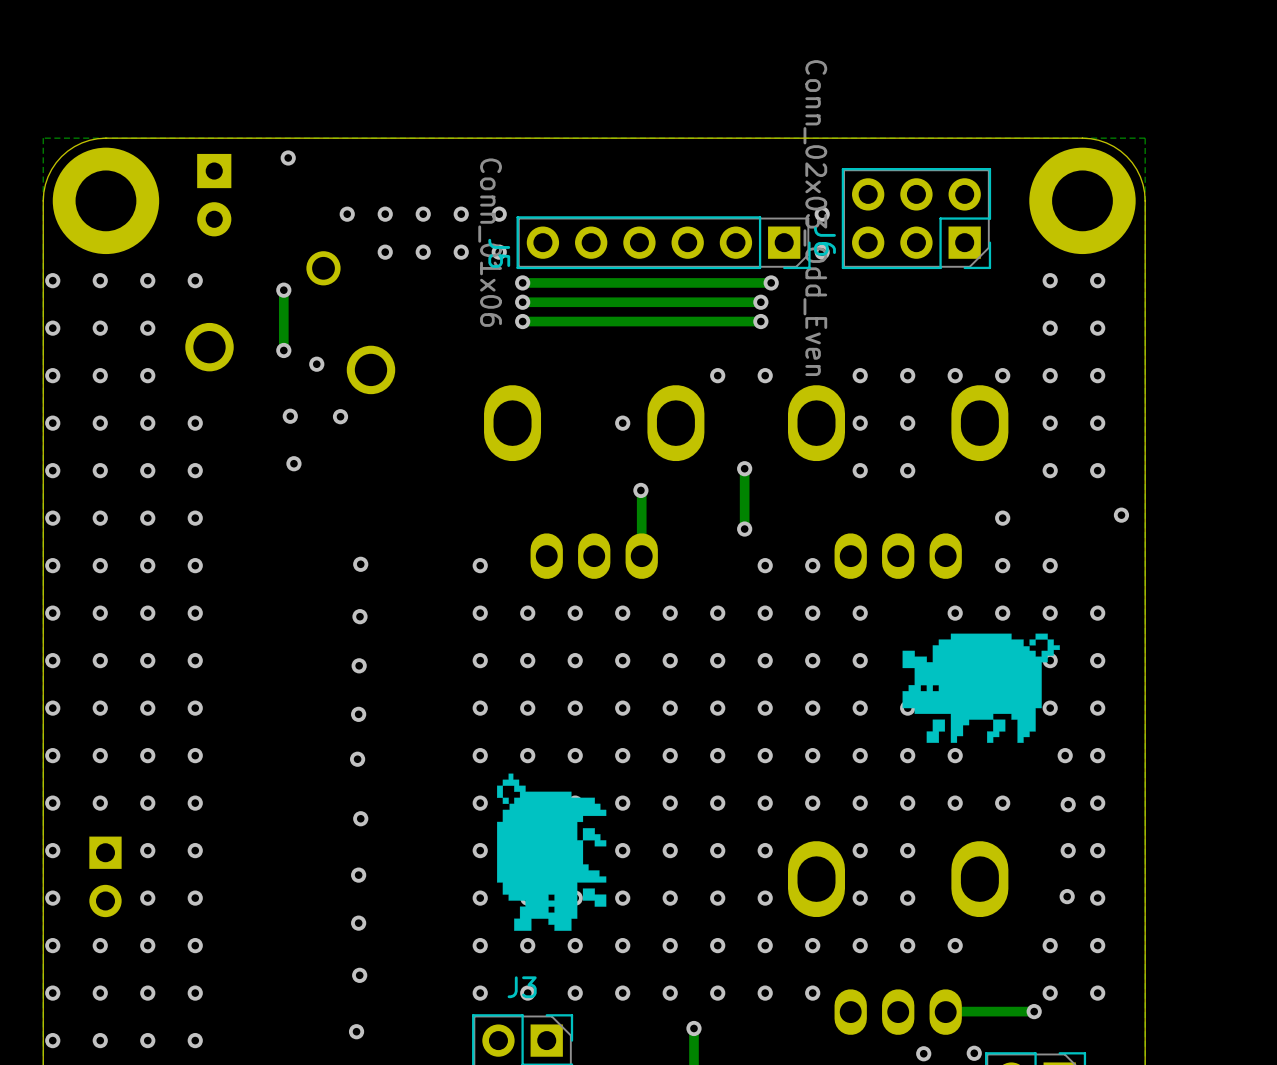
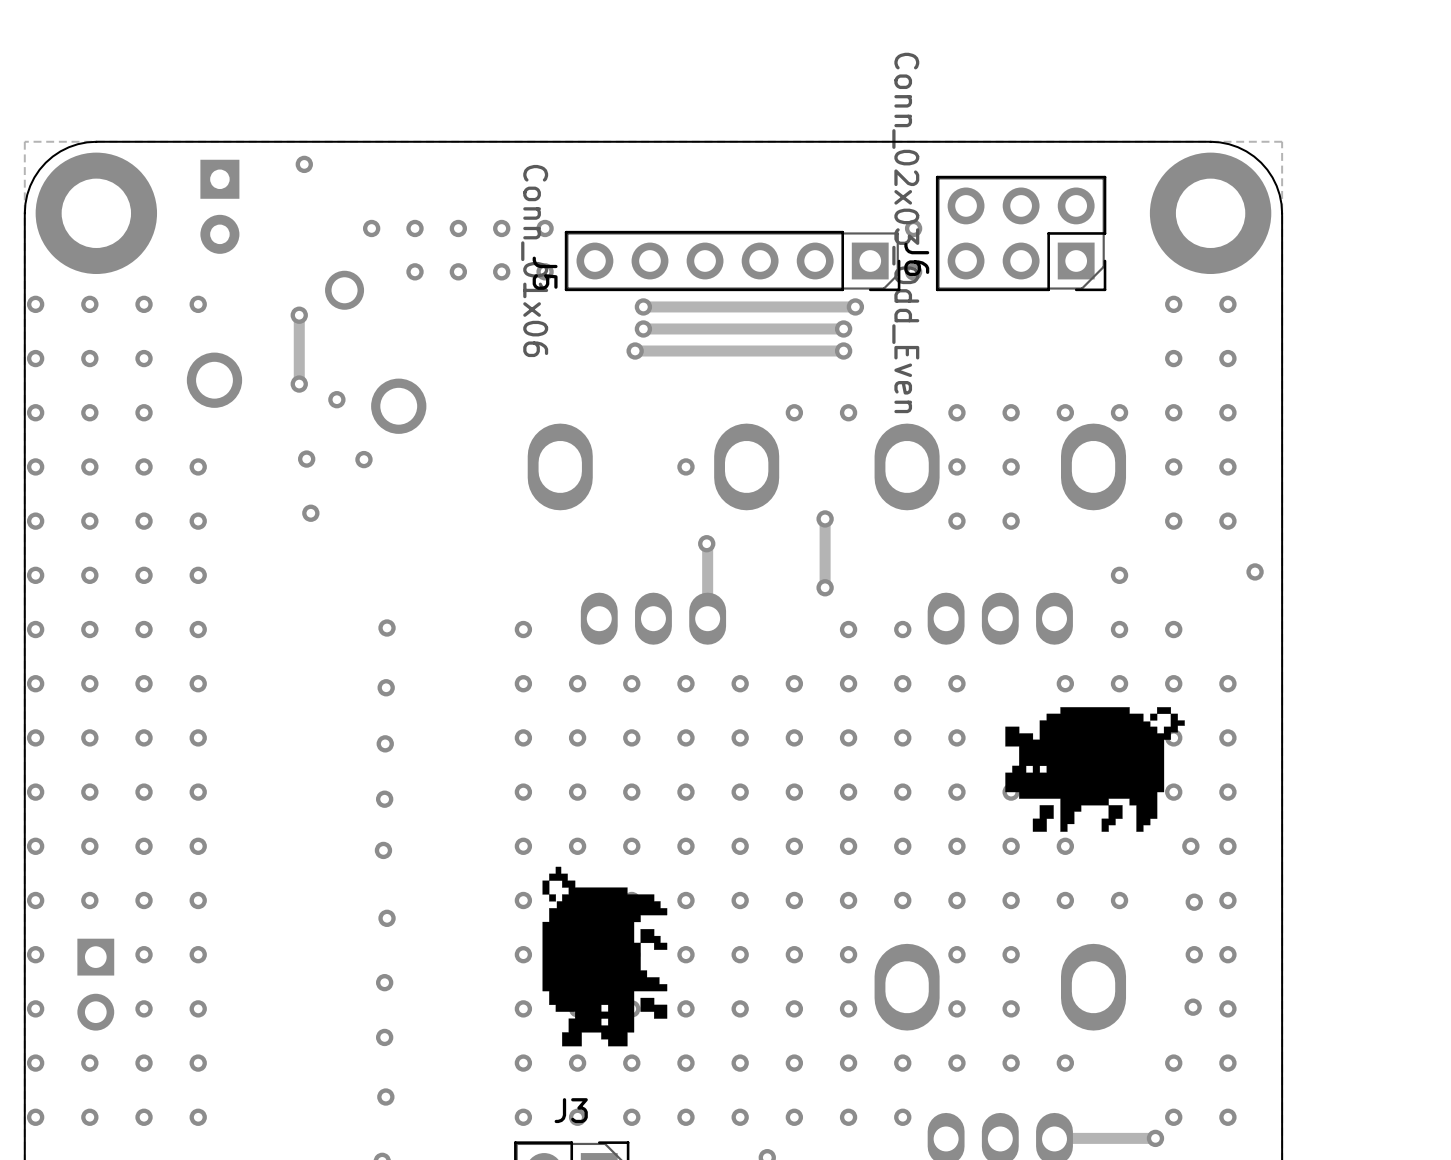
via: (522, 282) -> none
track: (585, 282) (522, 282) -> none
via: none -> (643, 306)
via: (522, 302) -> none
track: (585, 302) (522, 302) -> none
via: none -> (643, 328)
via: (522, 321) -> none
track: (578, 321) (522, 321) -> none
via: none -> (635, 351)

